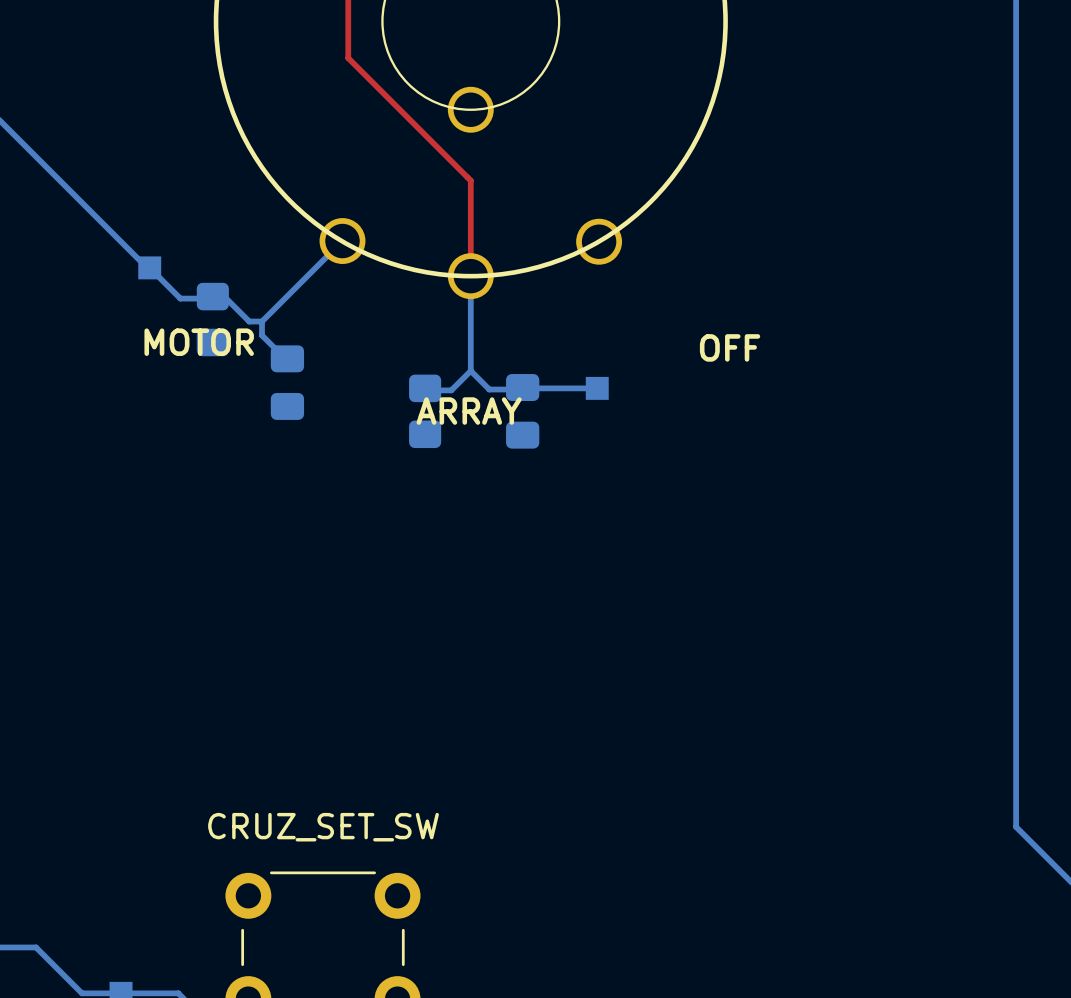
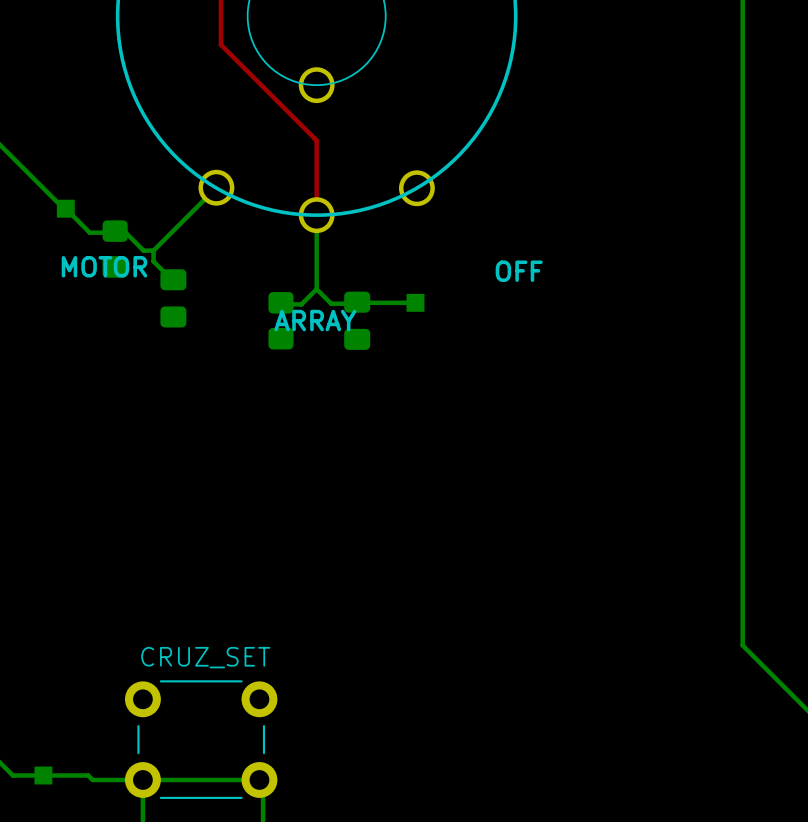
CRUZ_SET_SW name: CRUZ_SET_SW (323, 827) -> none
text: none -> CRUZ_SET (205, 657)

